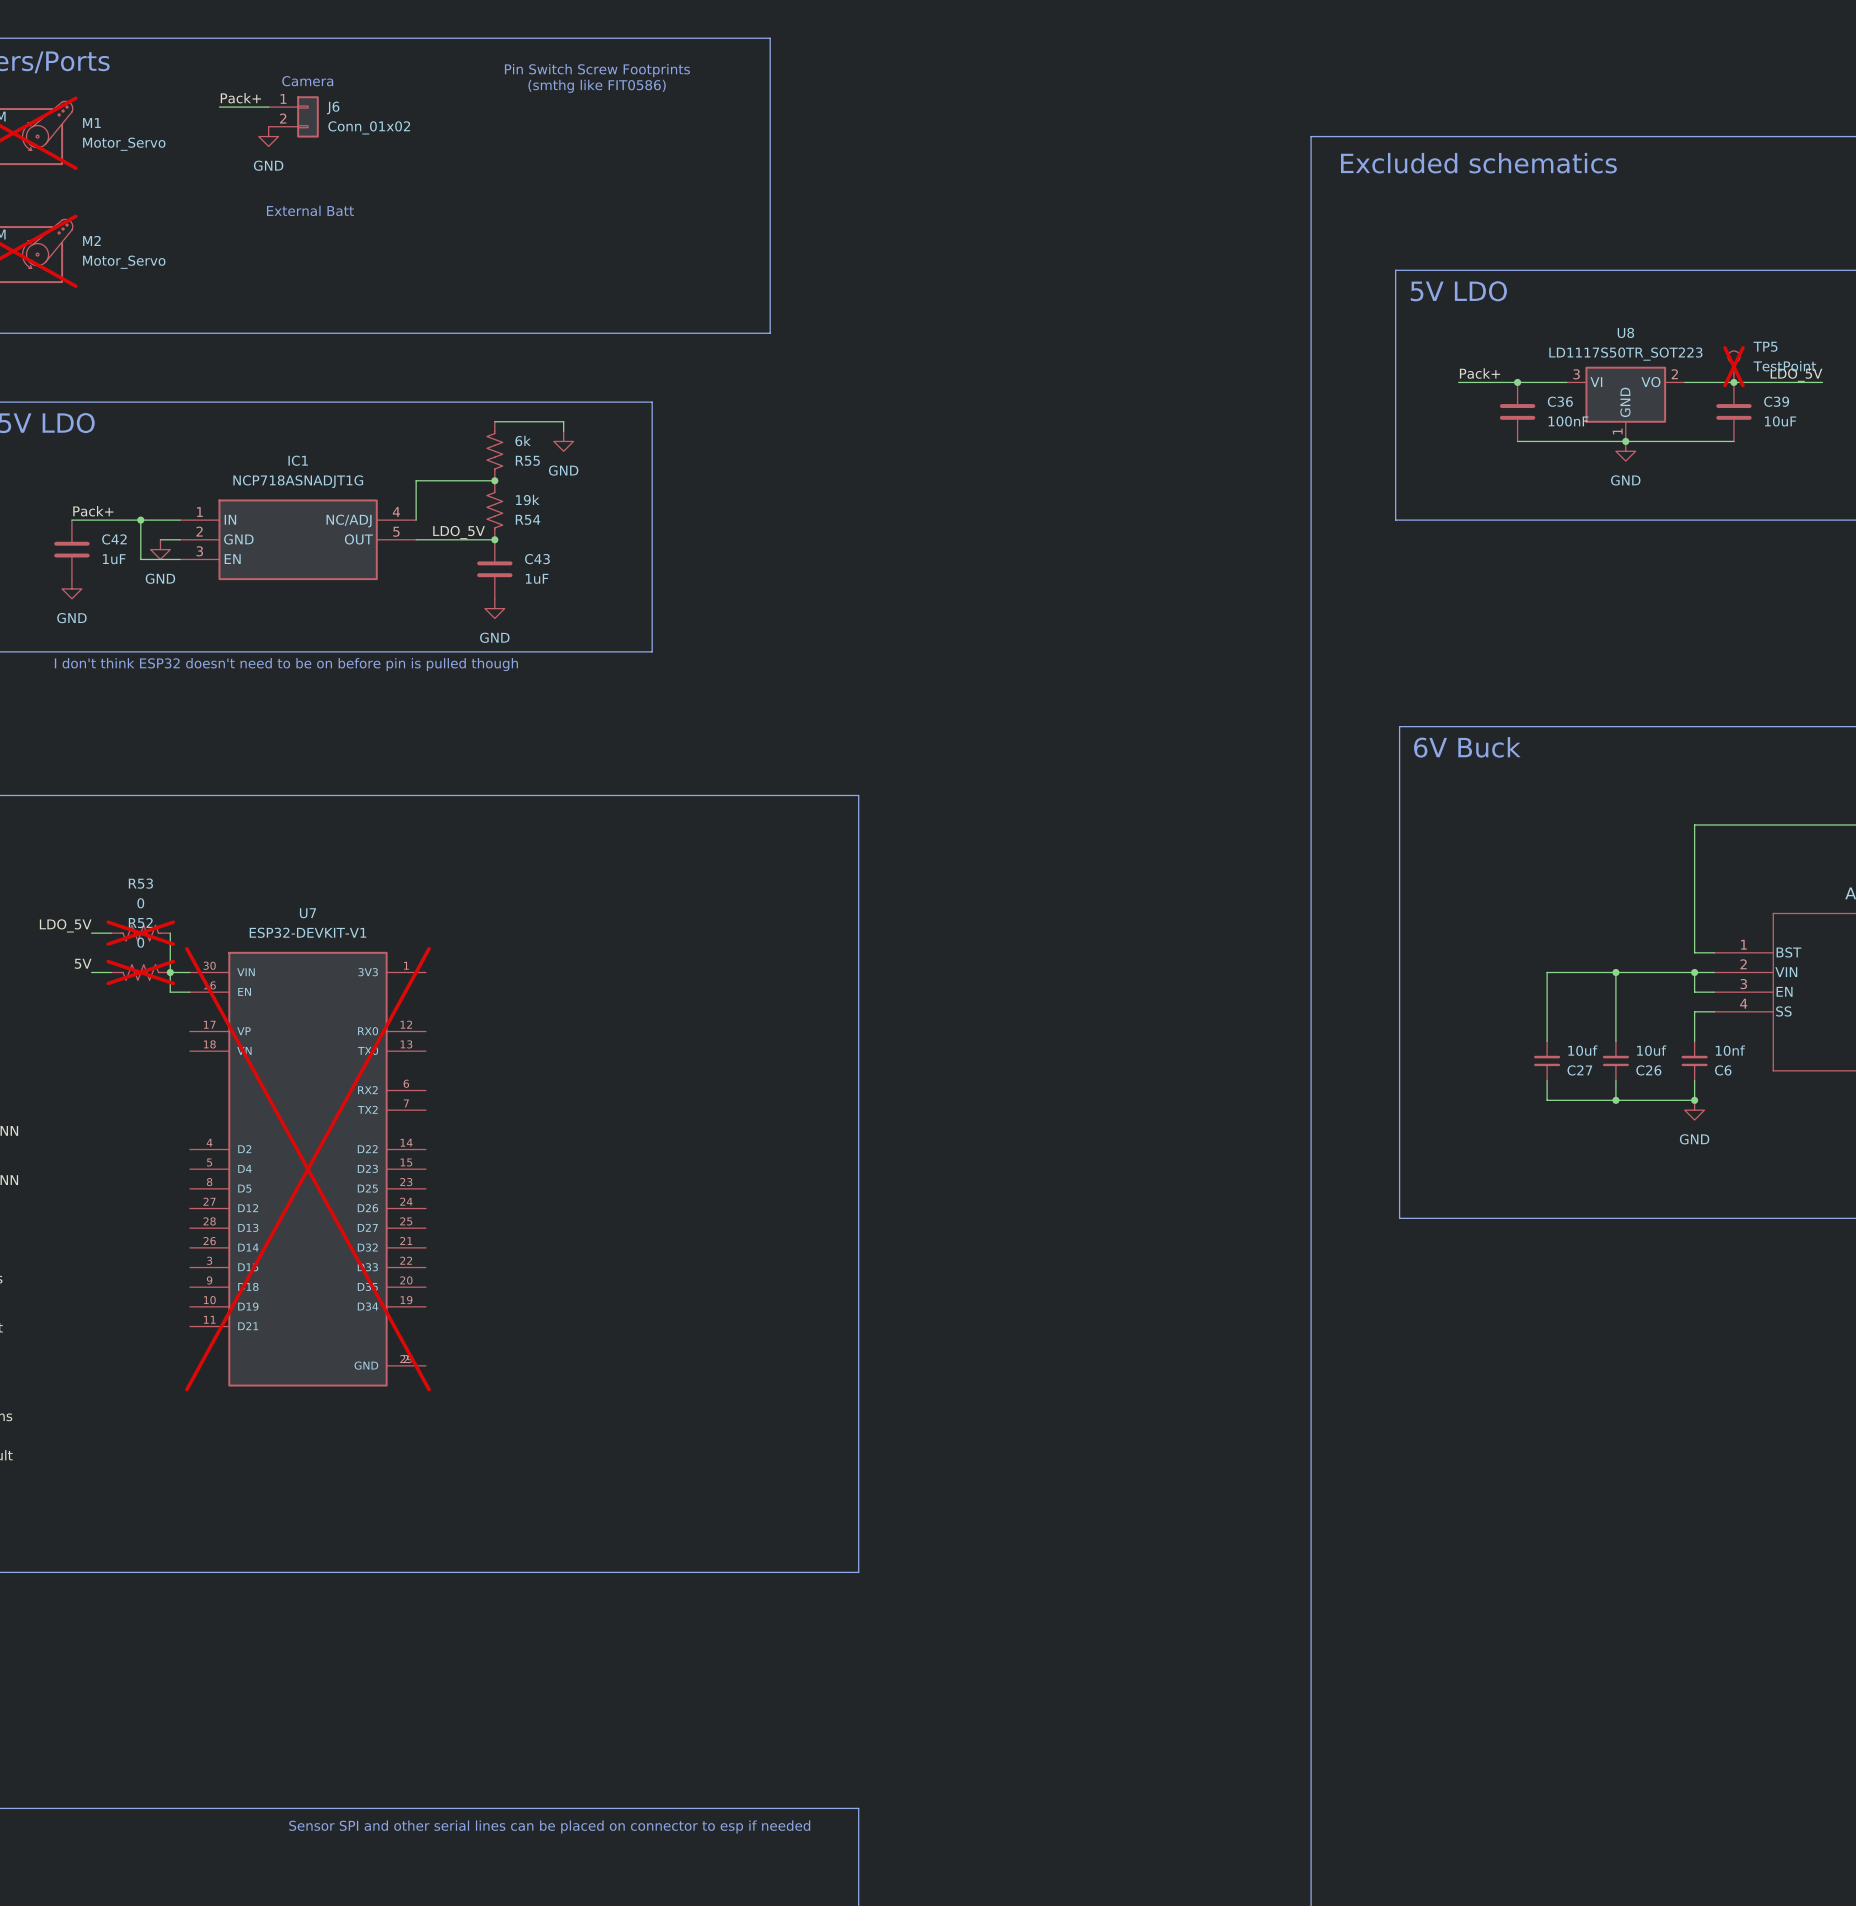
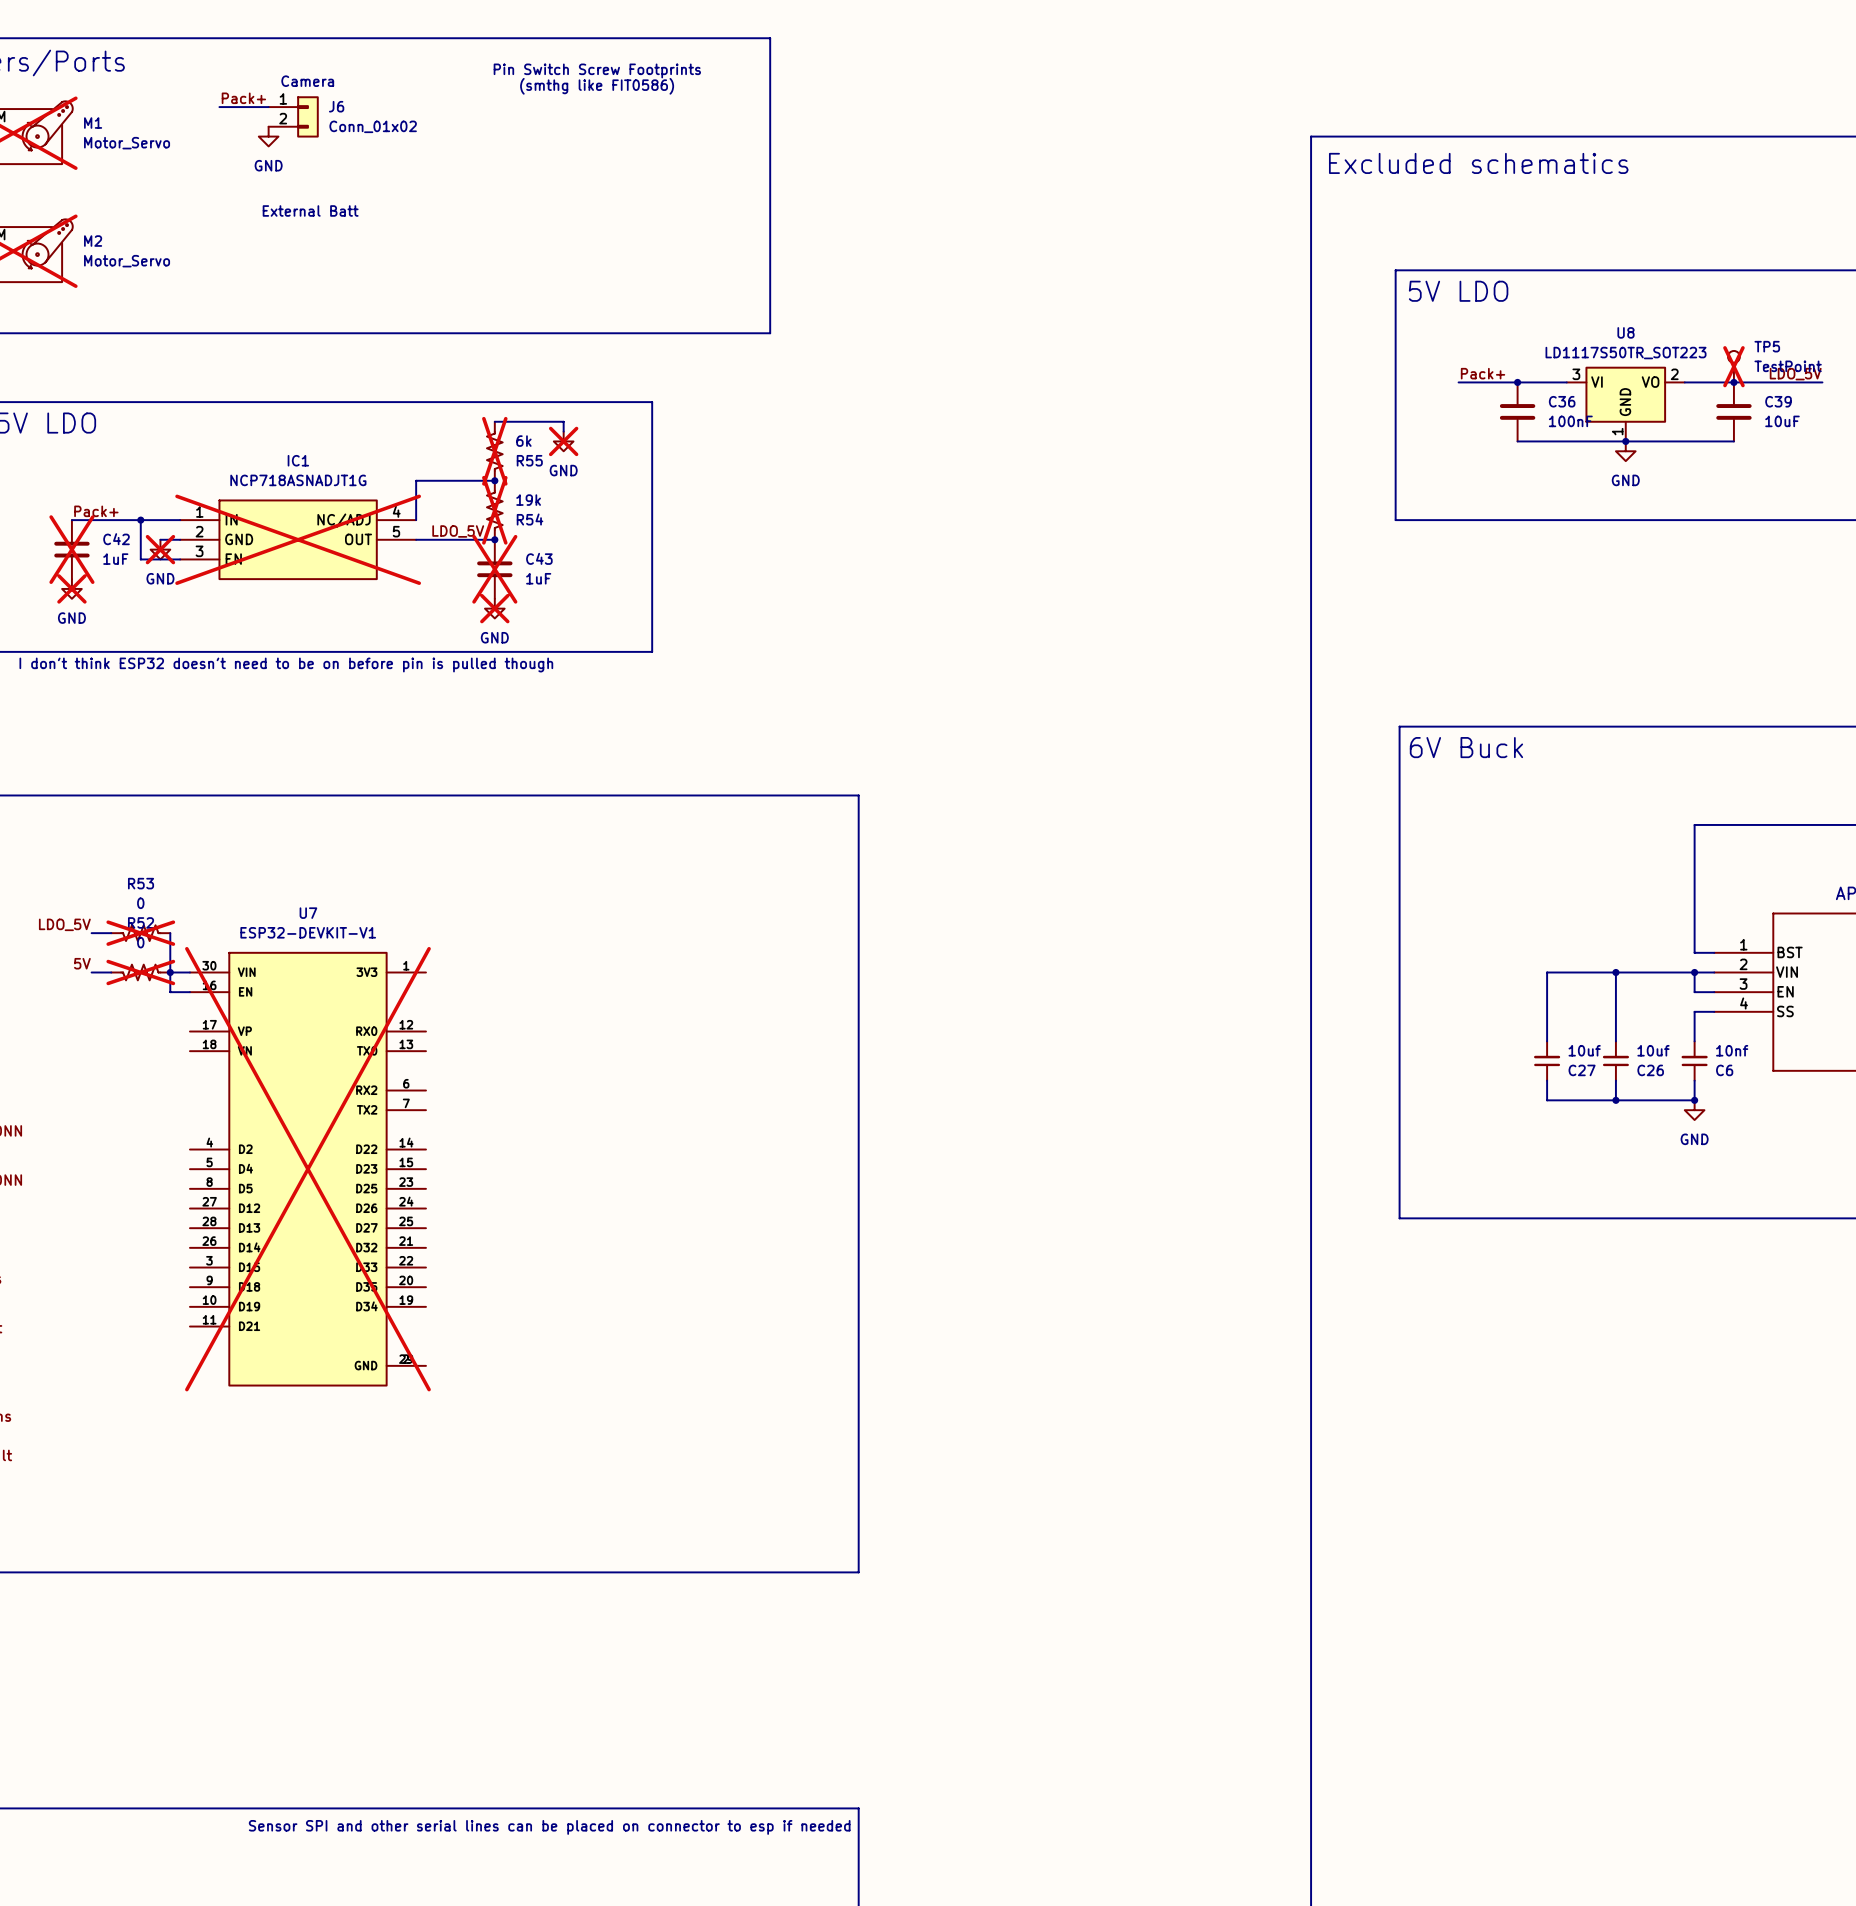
power symbol do-not-place cross: none -> (563, 441)
R55 do-not-place cross: none -> (494, 451)
R54 do-not-place cross: none -> (494, 510)
IC1 do-not-place cross: none -> (298, 539)
C42 do-not-place cross: none -> (71, 549)
power symbol do-not-place cross: none -> (160, 549)
C43 do-not-place cross: none -> (494, 569)
power symbol do-not-place cross: none -> (71, 588)
power symbol do-not-place cross: none -> (494, 608)

